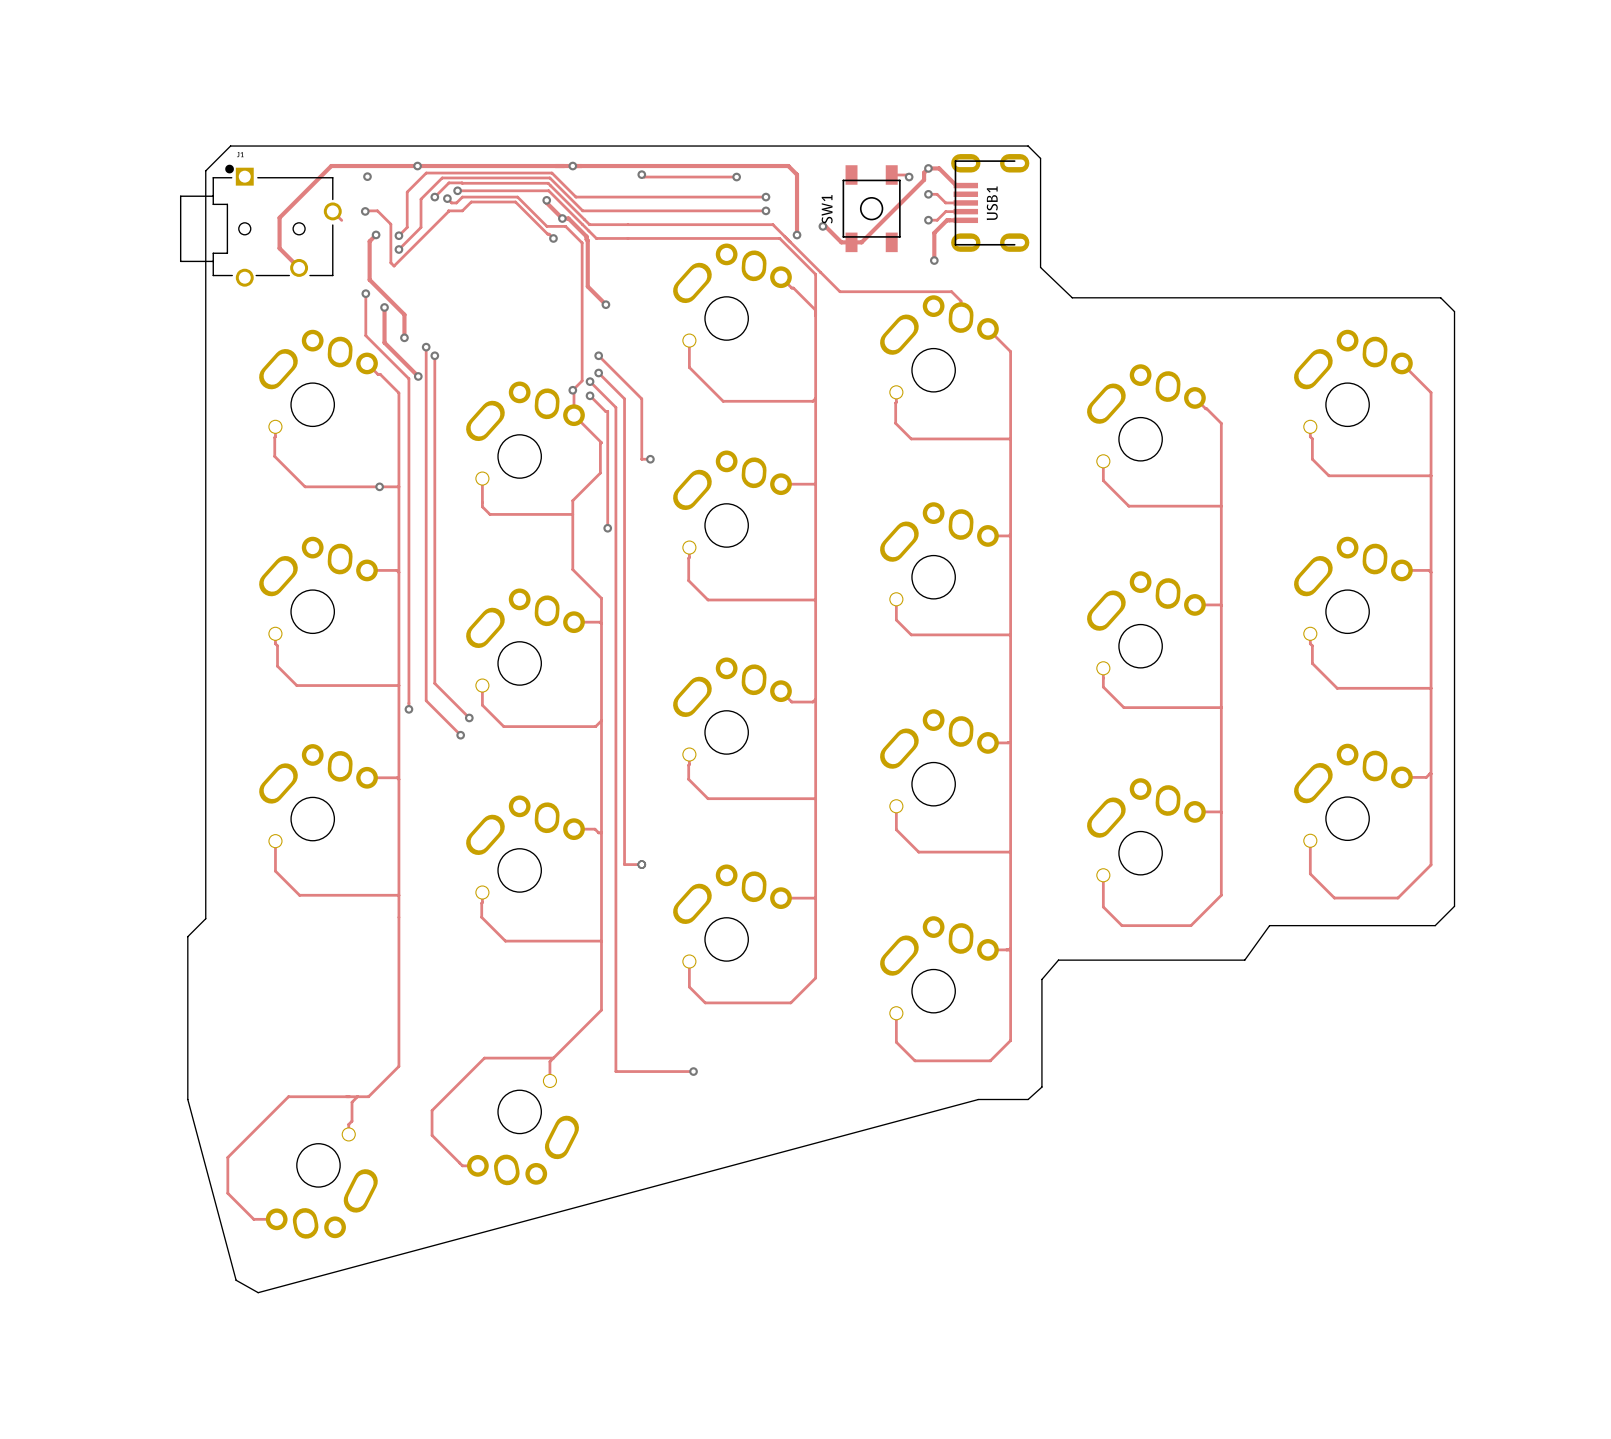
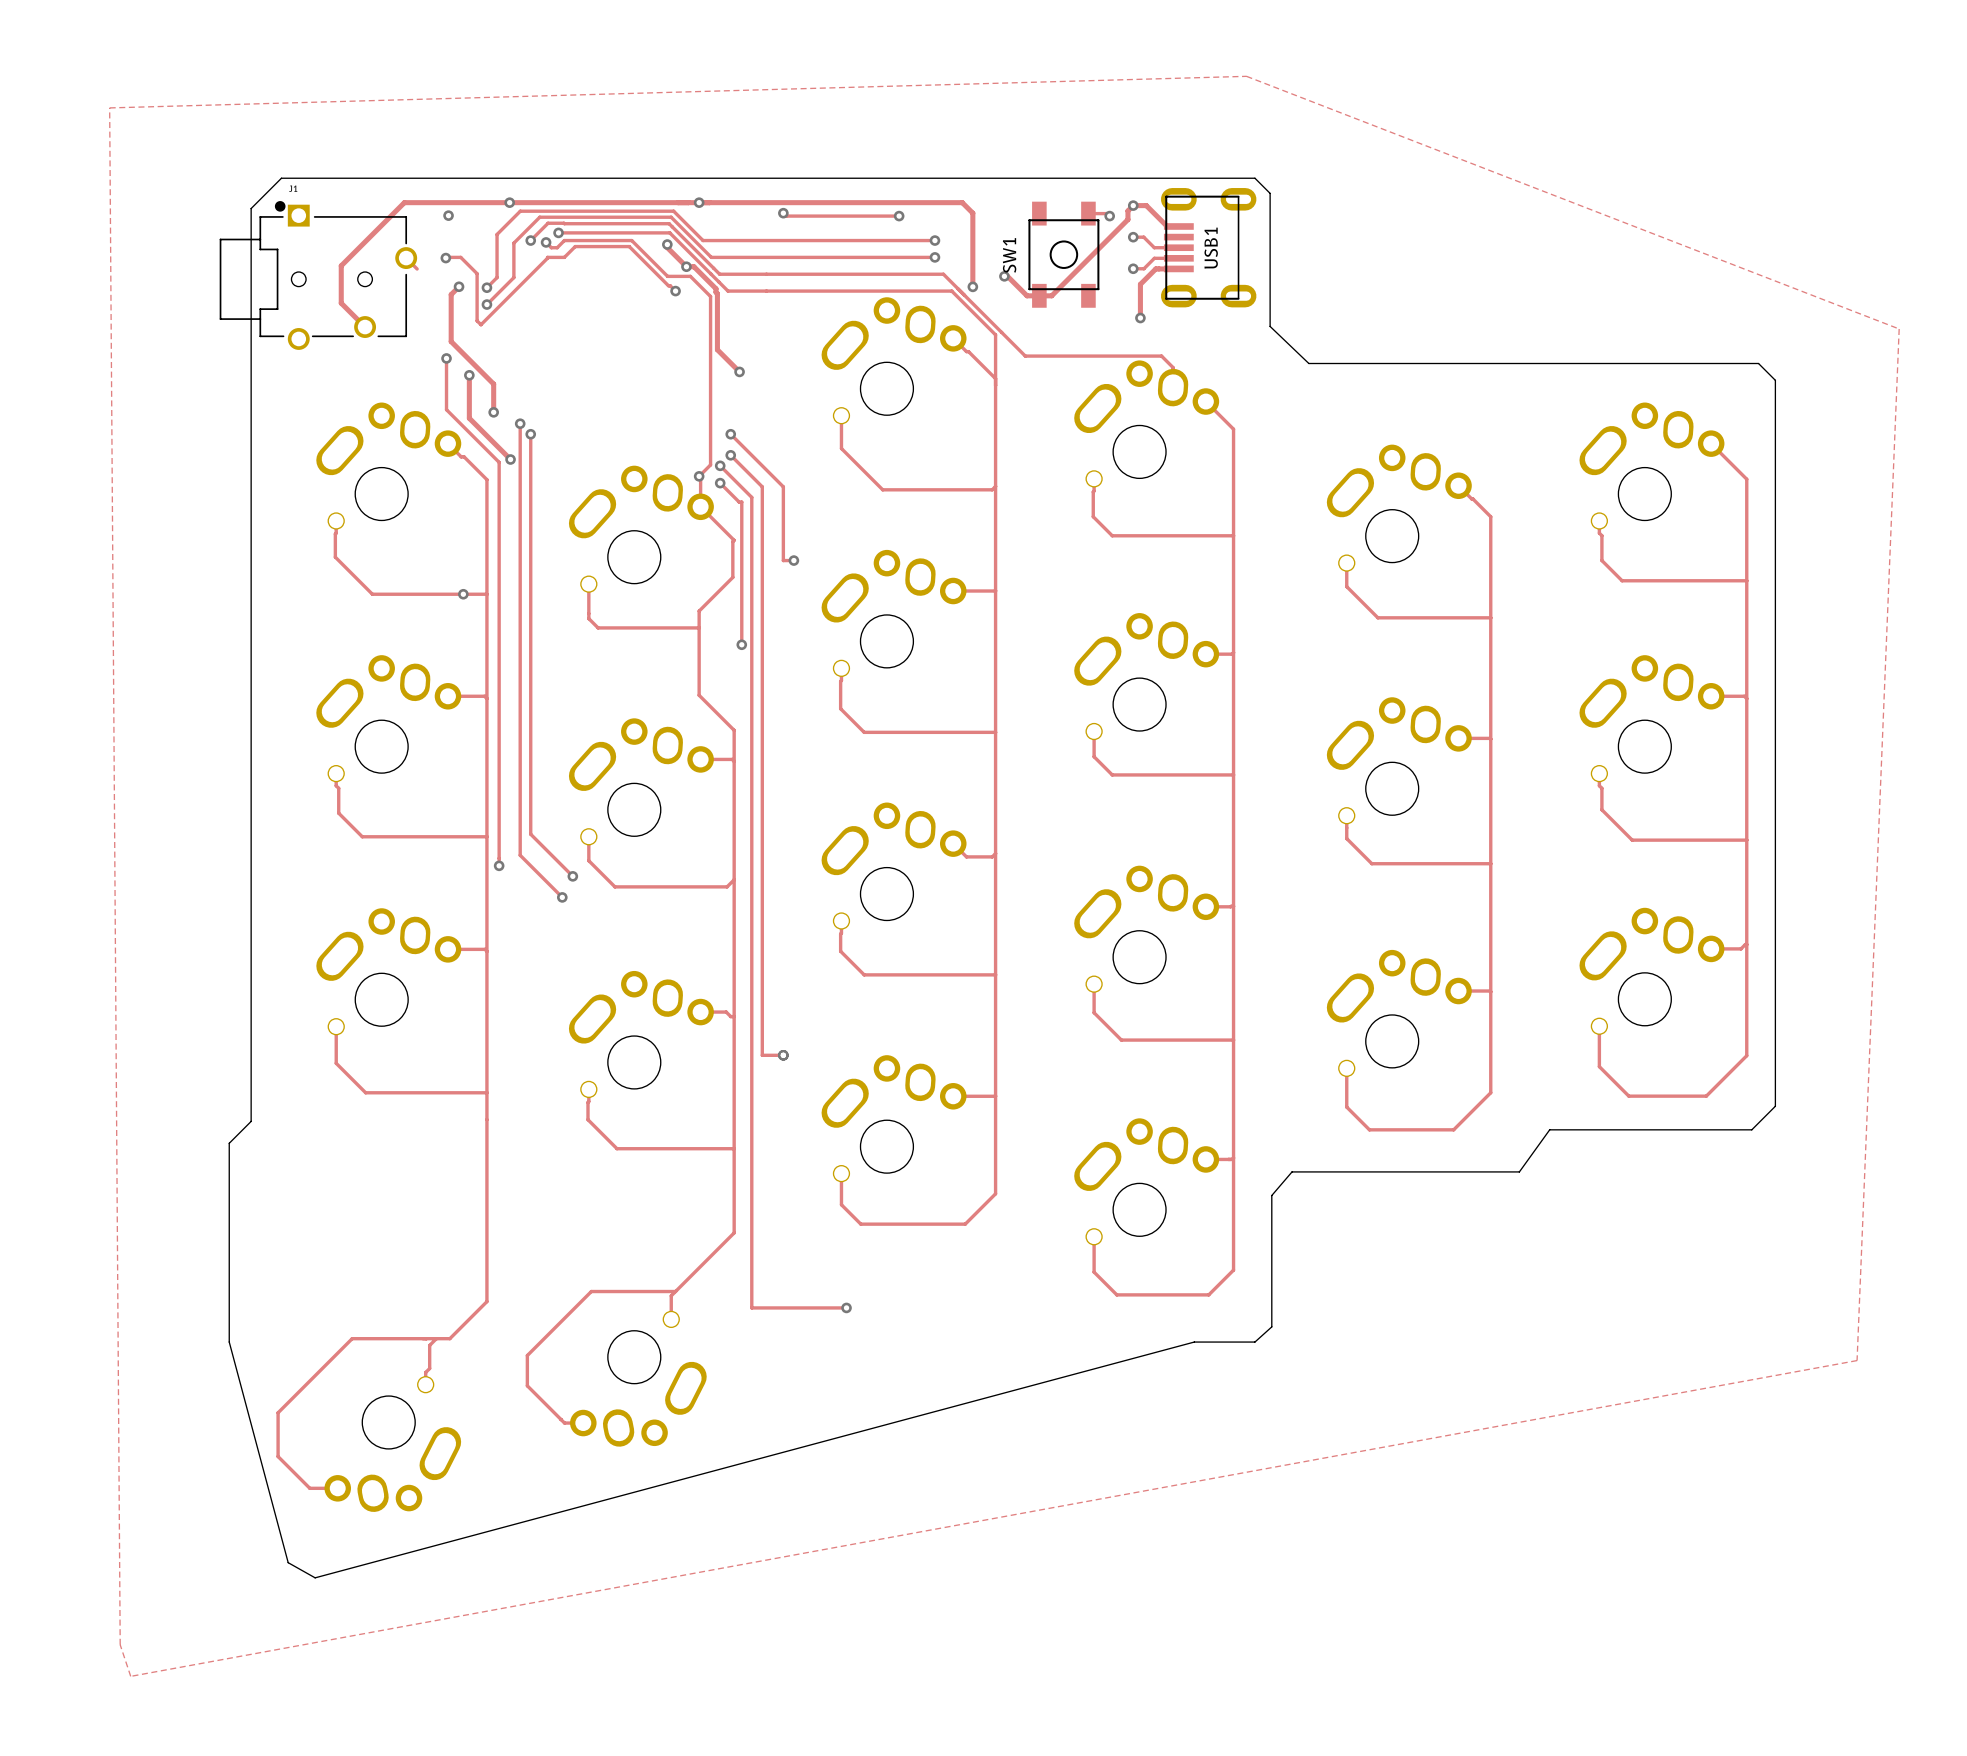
zone outline: none -> (1246, 76) (109, 107) (120, 1644) (130, 1676) (1857, 1360) (1899, 328) (1246, 76)
USB1 footprint: [951, 154, 1030, 252] -> [1160, 188, 1257, 308]

